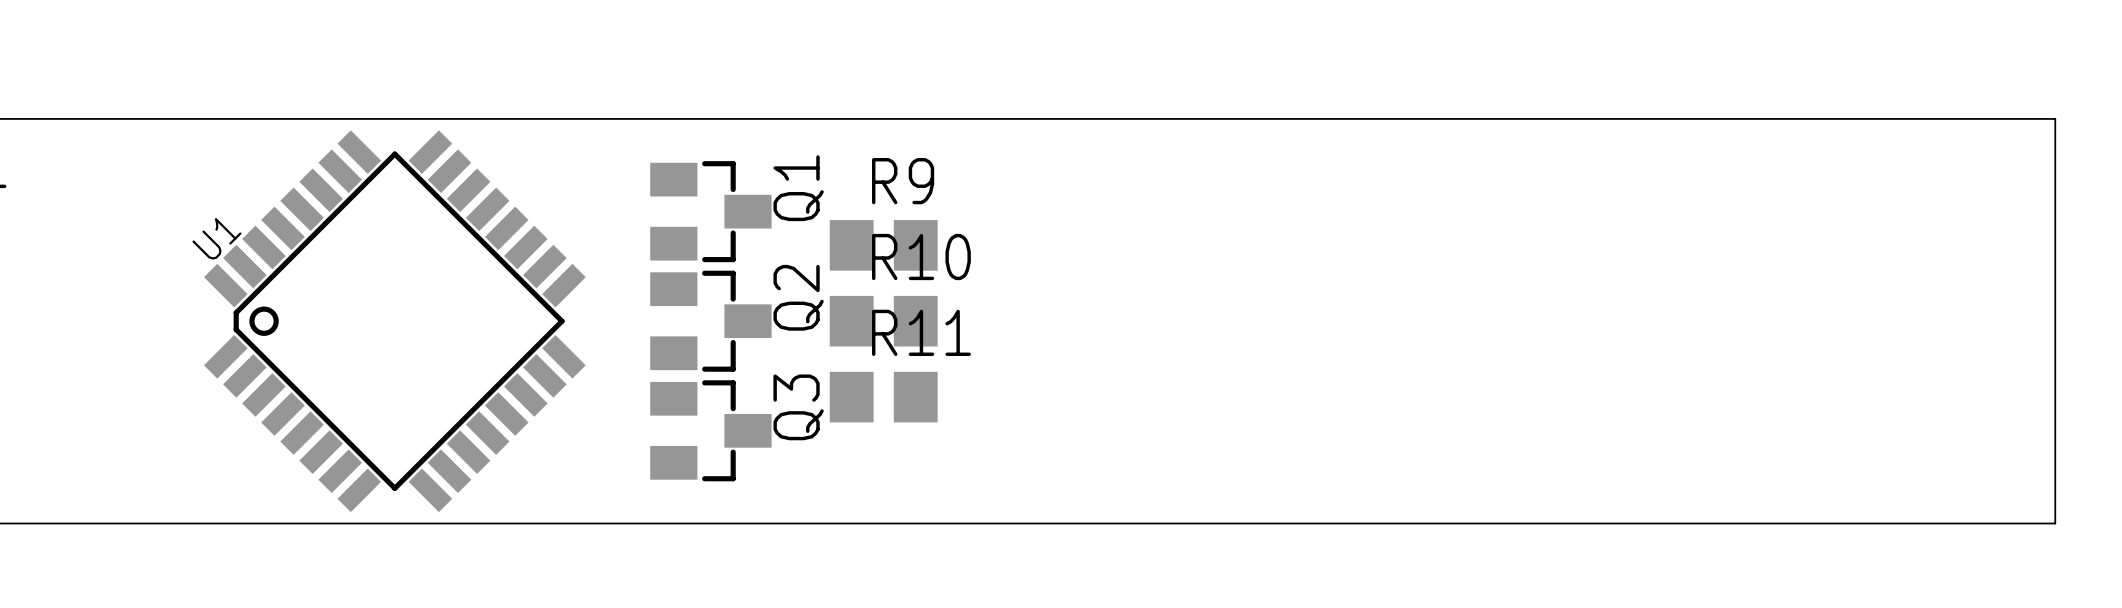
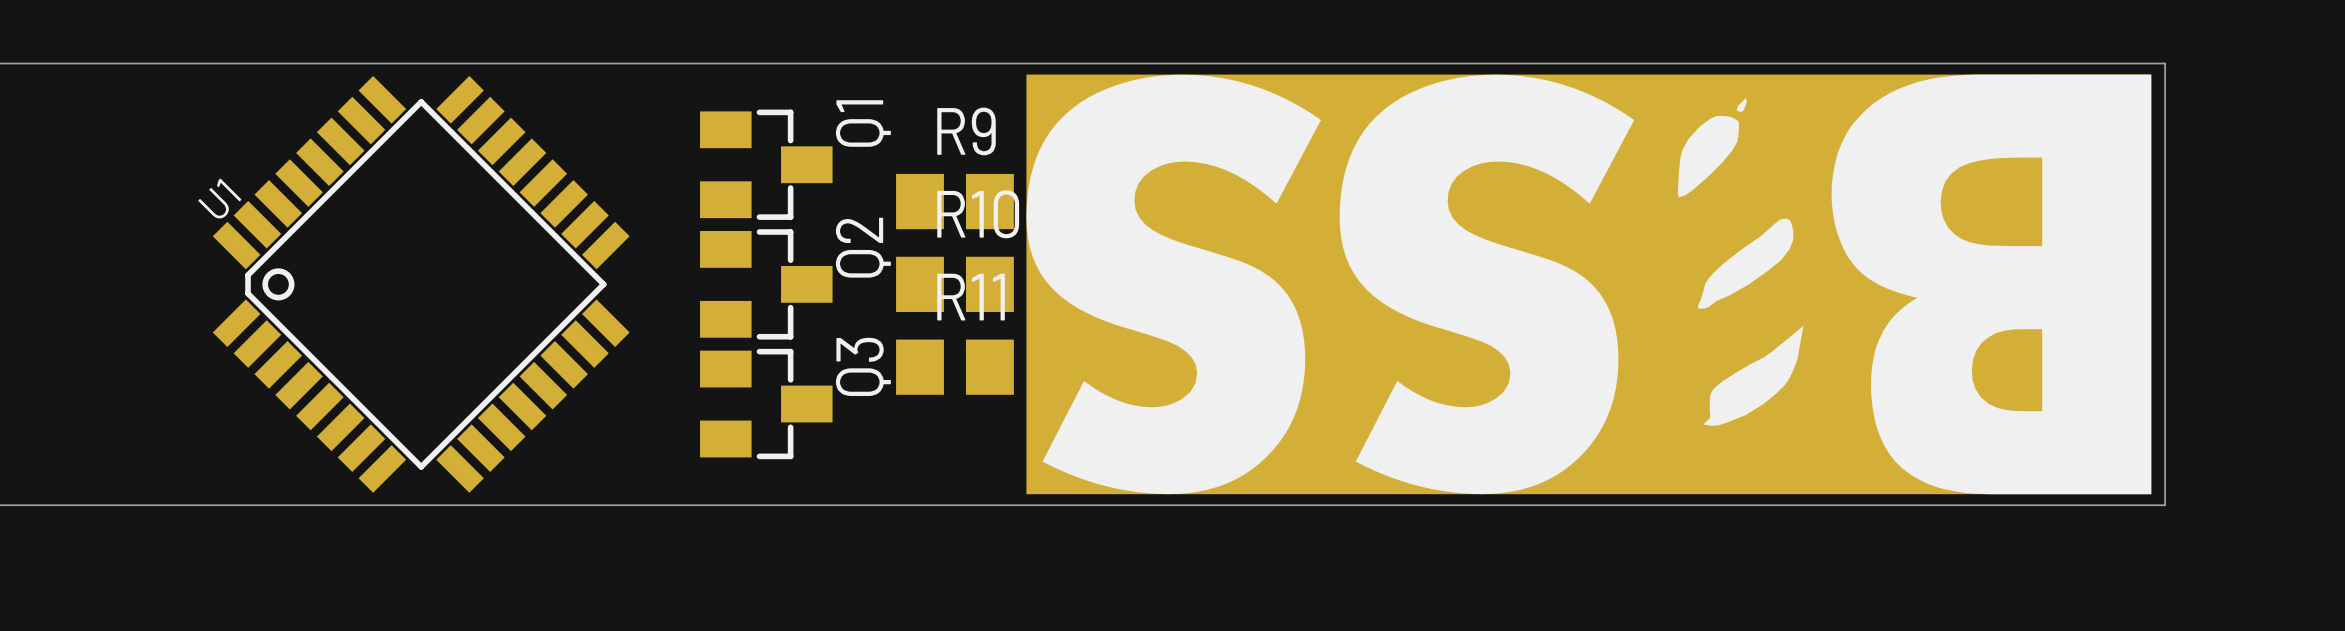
board edge: (1992, 118) (2055, 118) (2055, 523) (1992, 523) -> (2165, 63) (2165, 505)
part: none -> (1588, 284)

